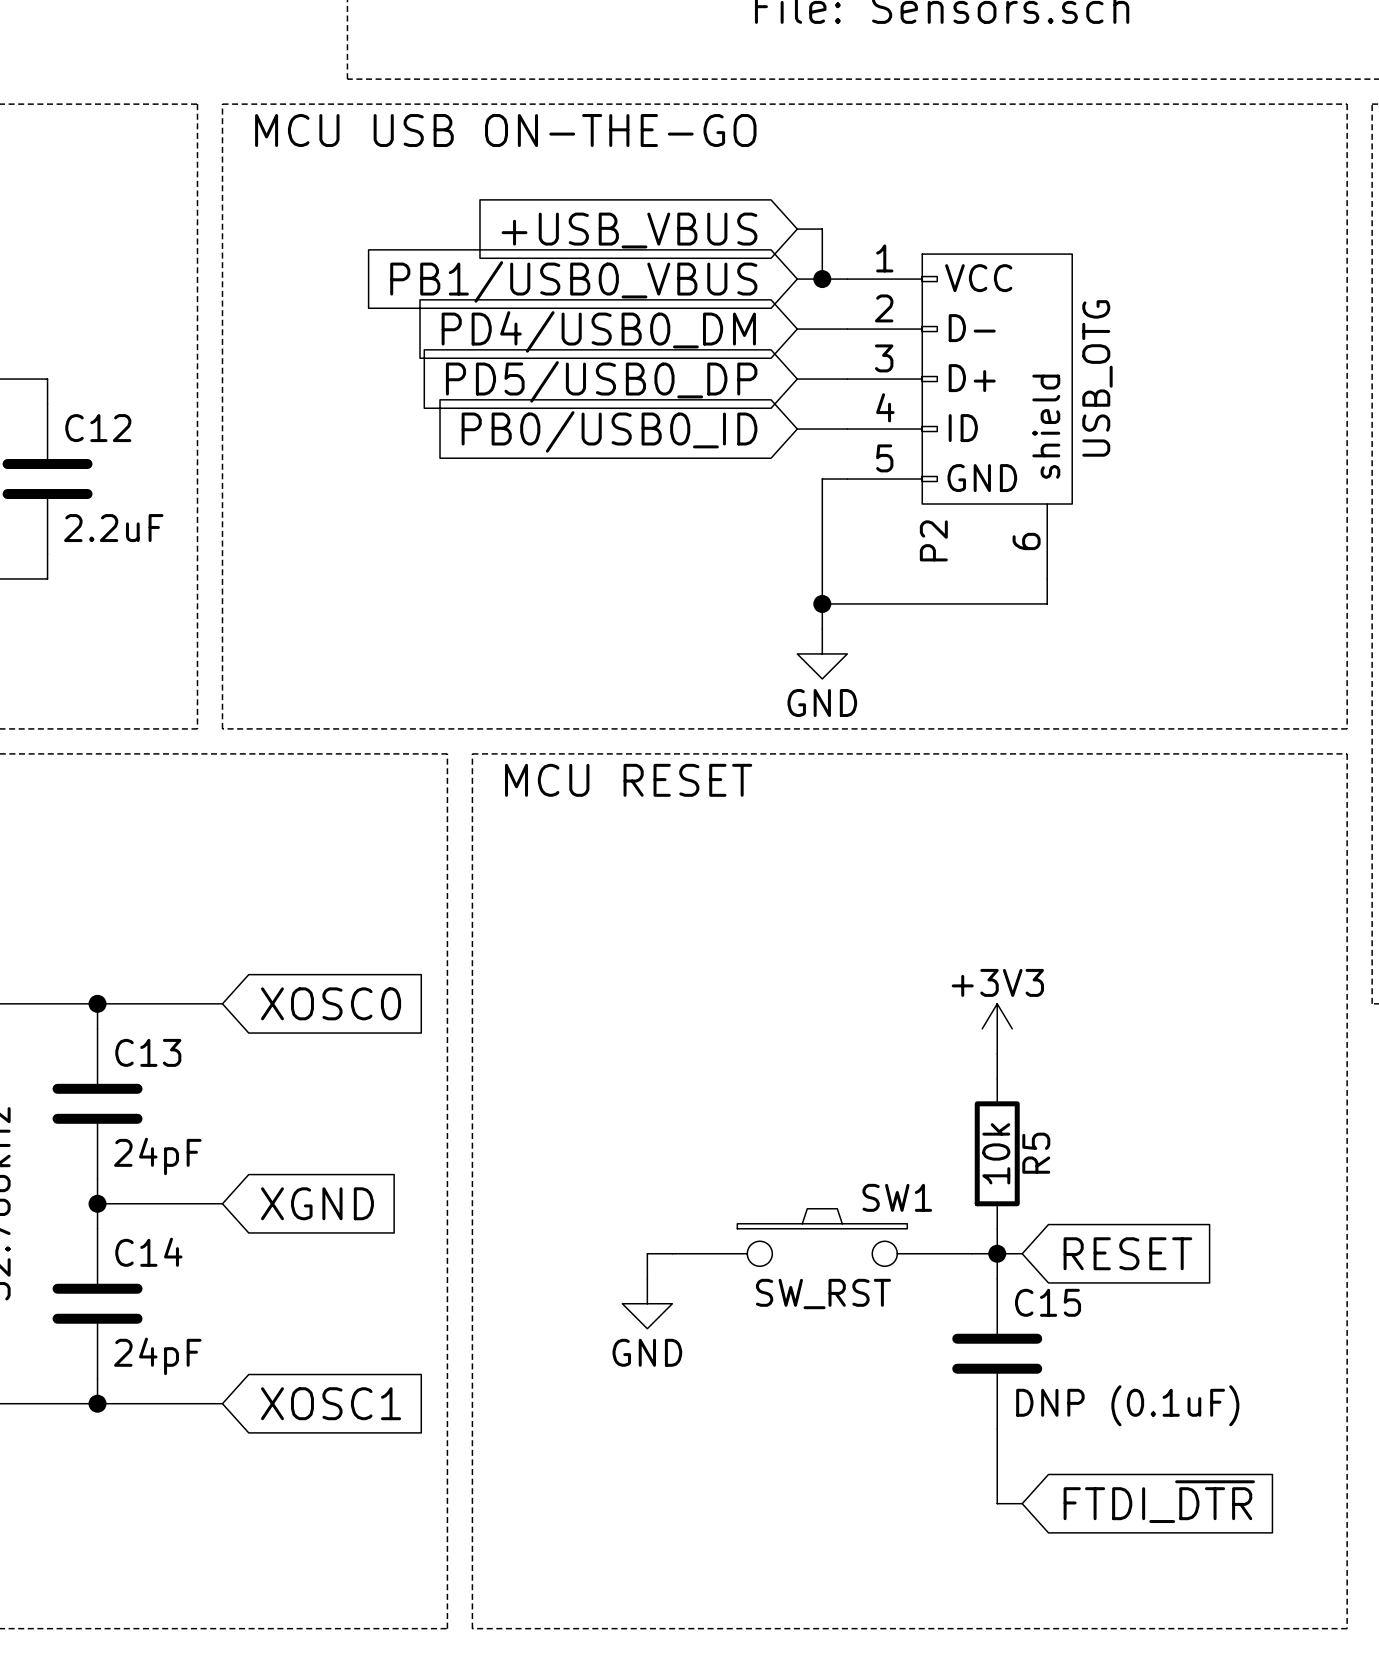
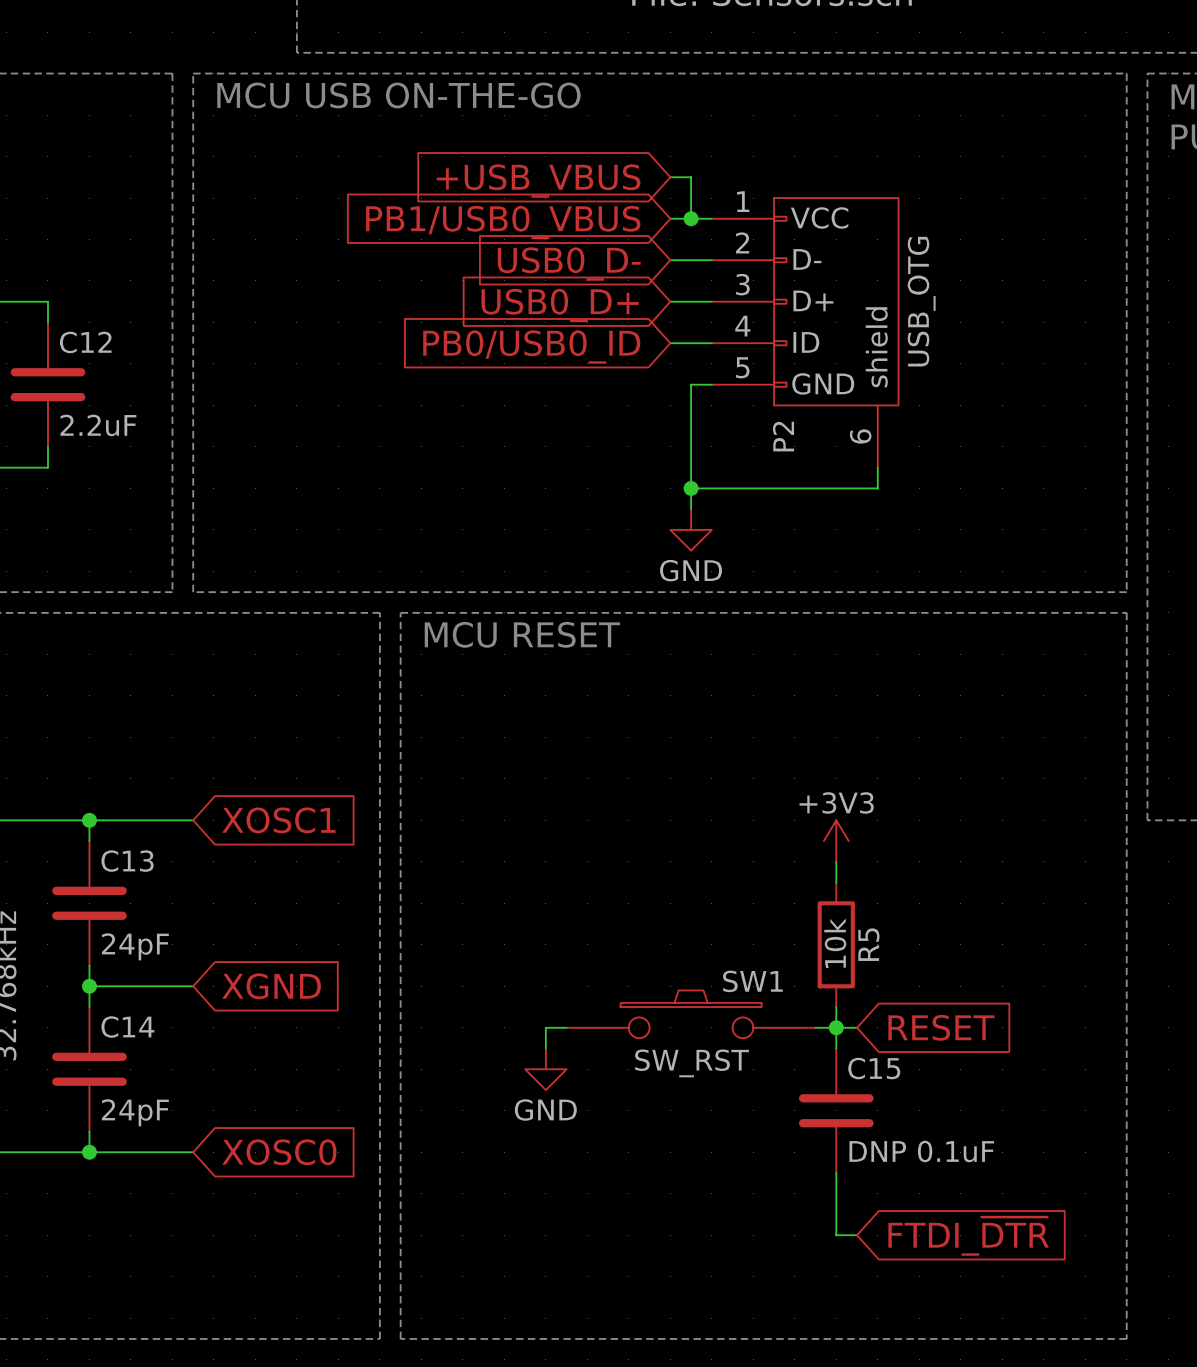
global label: PD4/USB0_DM (598, 331) -> USB0_D- (569, 264)
global label: PD5/USB0_DP (601, 381) -> USB0_D+ (560, 305)
global label: XOSC0 (331, 1003) -> XOSC1 (278, 820)
global label: XOSC1 (331, 1403) -> XOSC0 (279, 1152)
C15 value: DNP (0.1uF) (1127, 1405) -> DNP 0.1uF (921, 1151)

